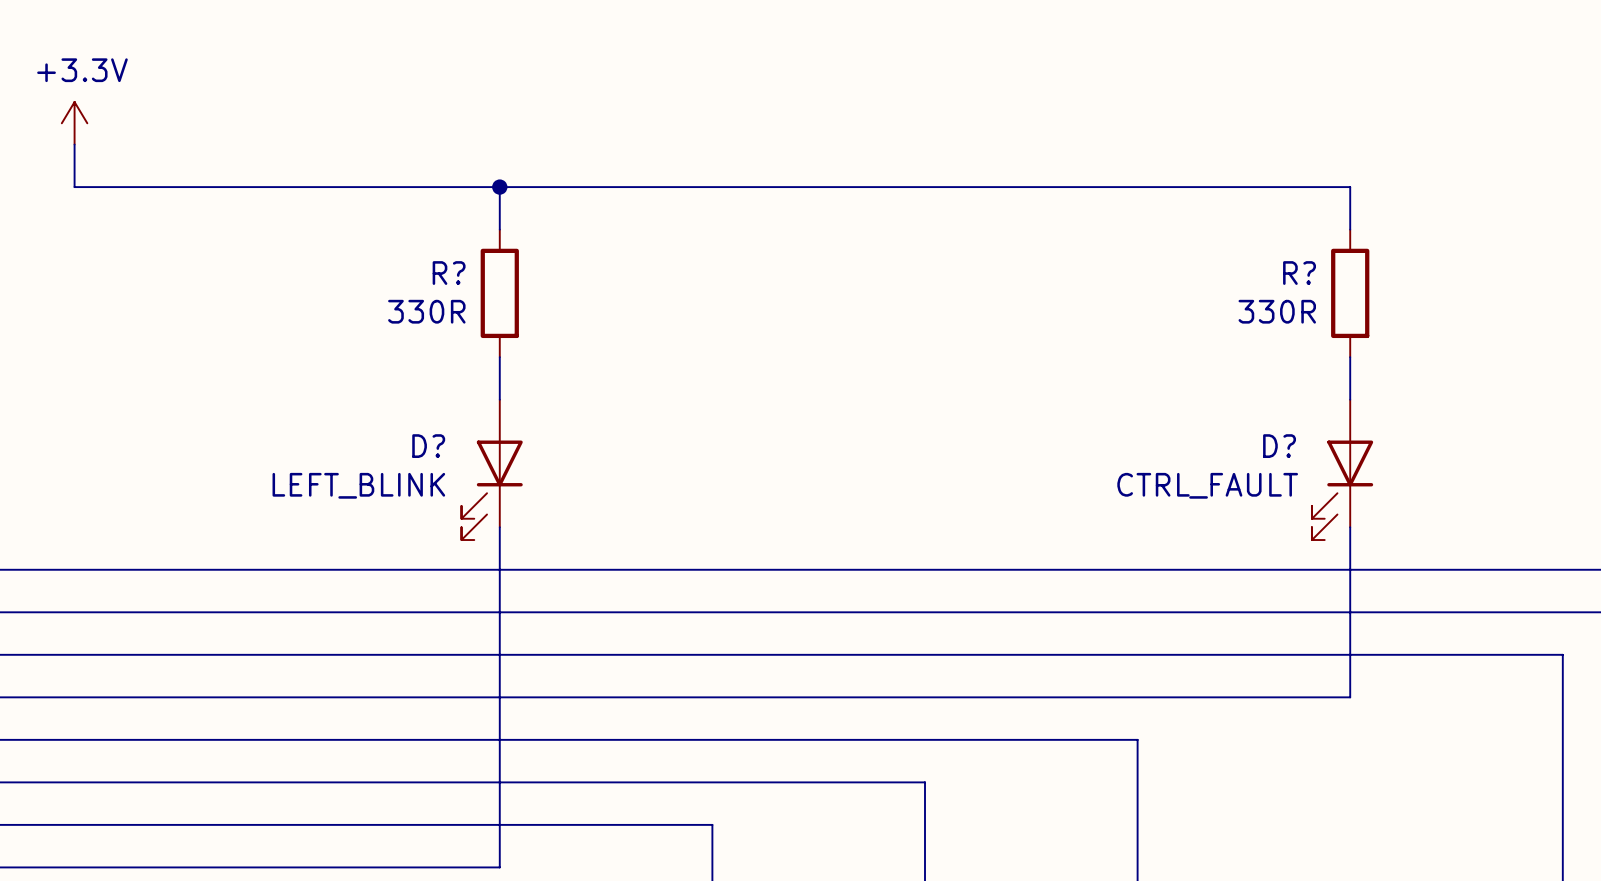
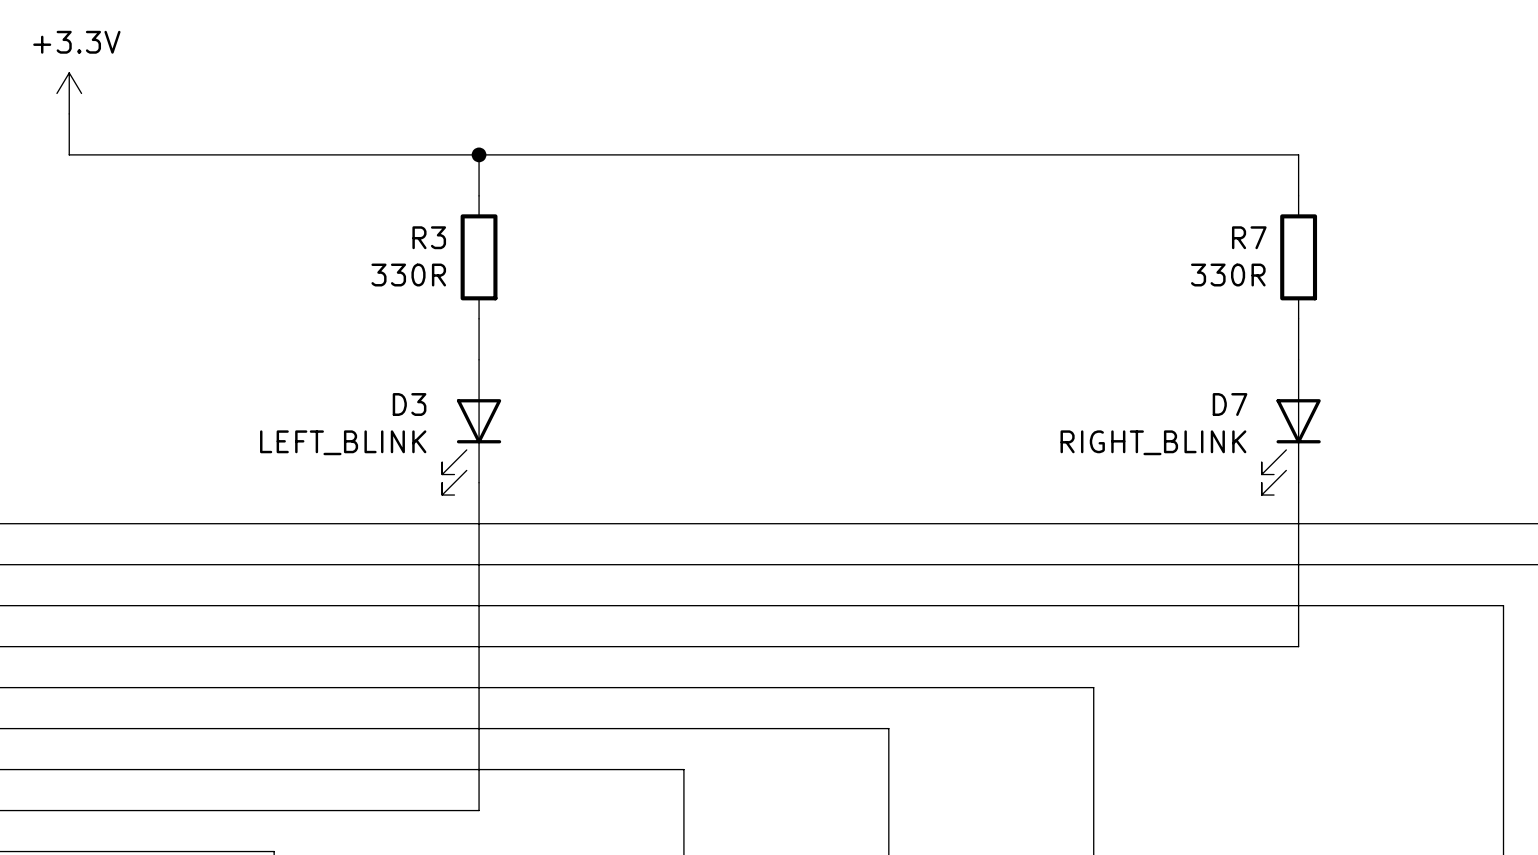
R? name: R? (449, 273) -> R3 (429, 237)
R? name: R? (1299, 273) -> R7 (1249, 237)
D? name: D? (428, 446) -> D3 (409, 404)
D? name: D? (1279, 446) -> D7 (1230, 404)
D? value: CTRL_FAULT (1207, 485) -> RIGHT_BLINK (1153, 442)

